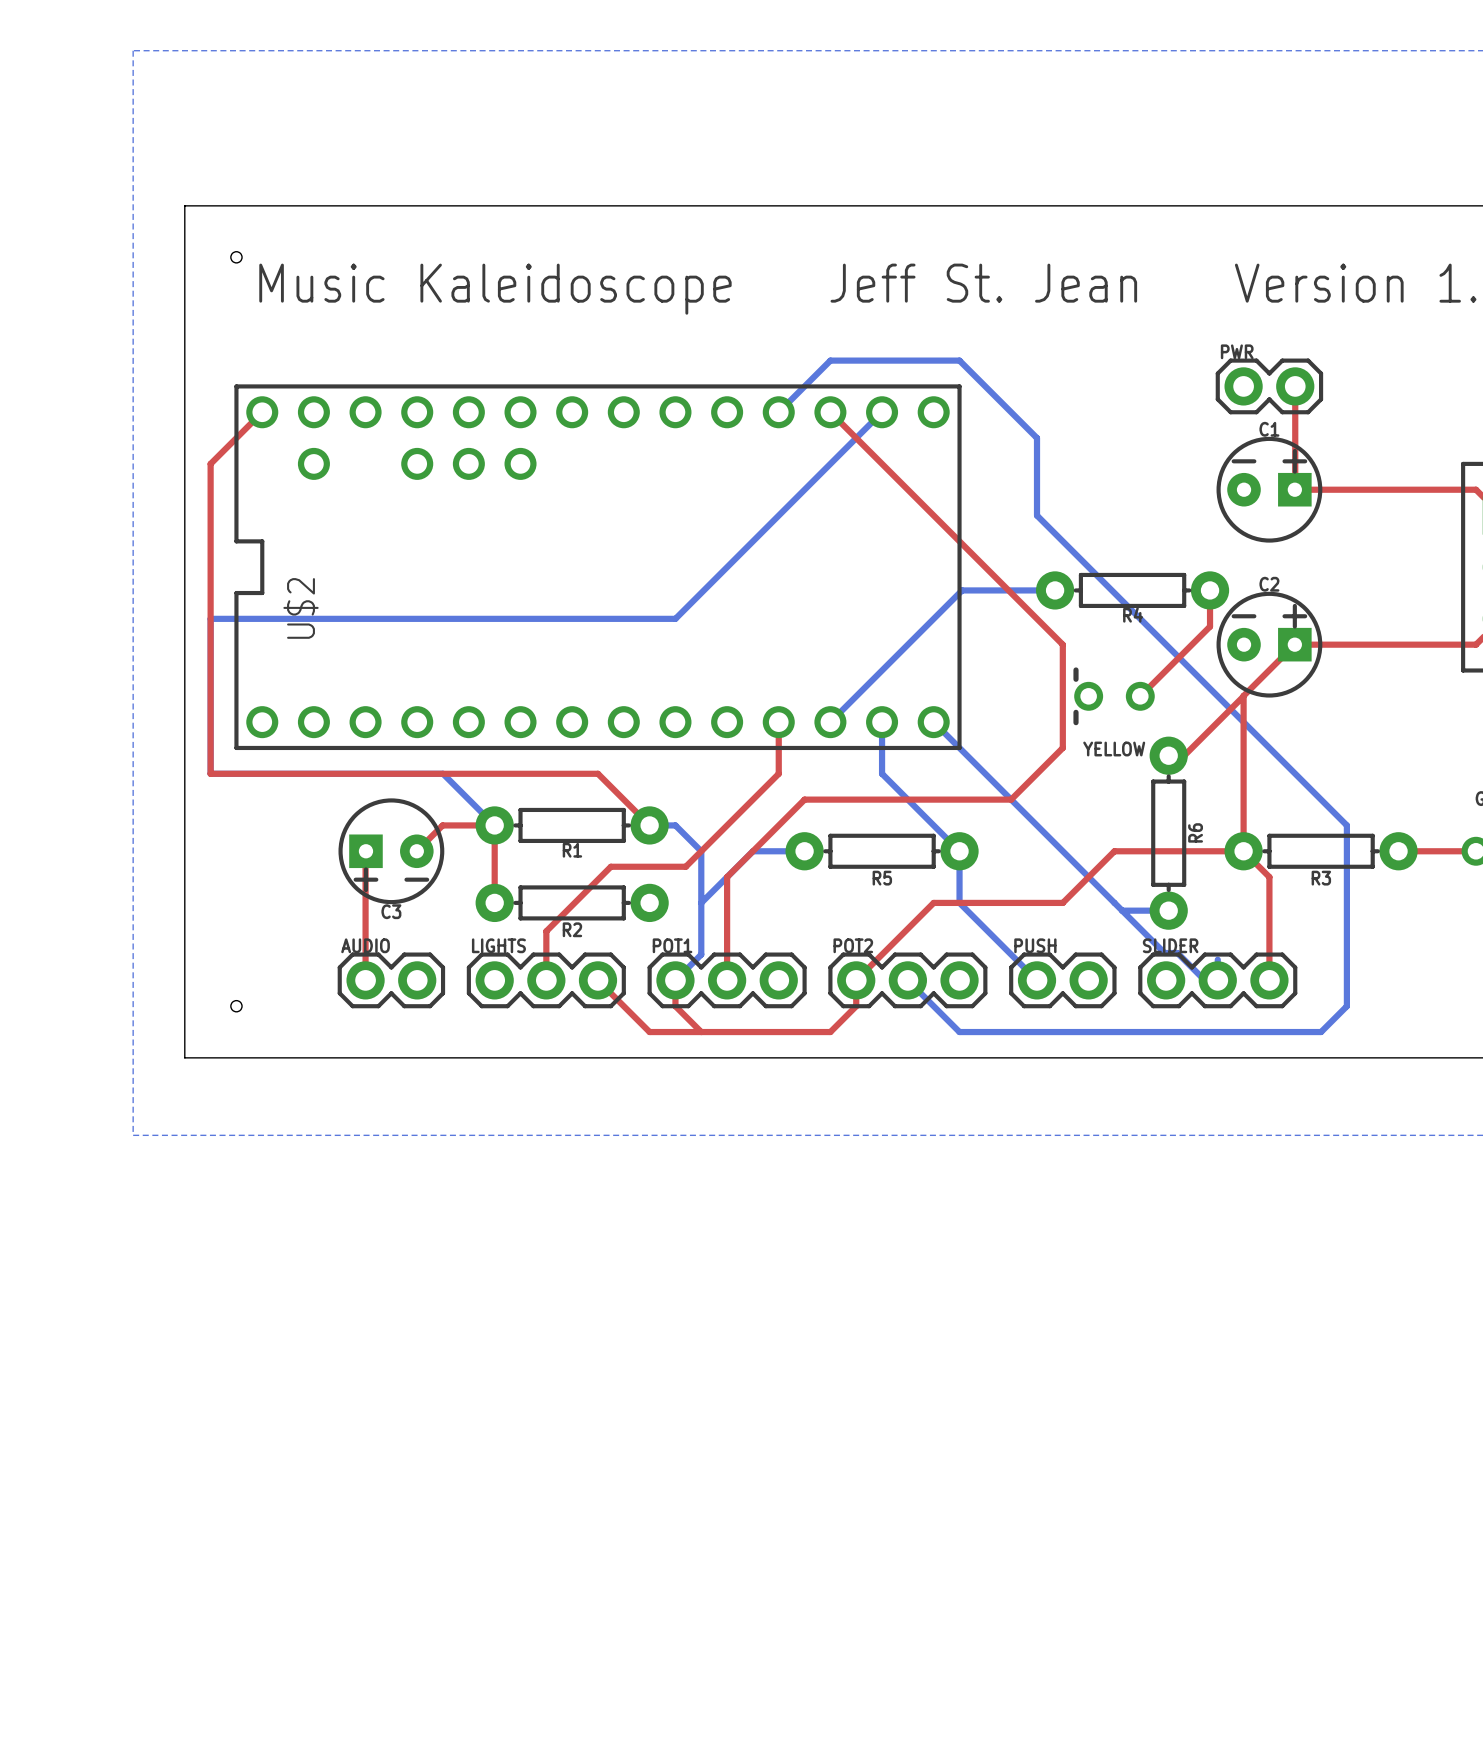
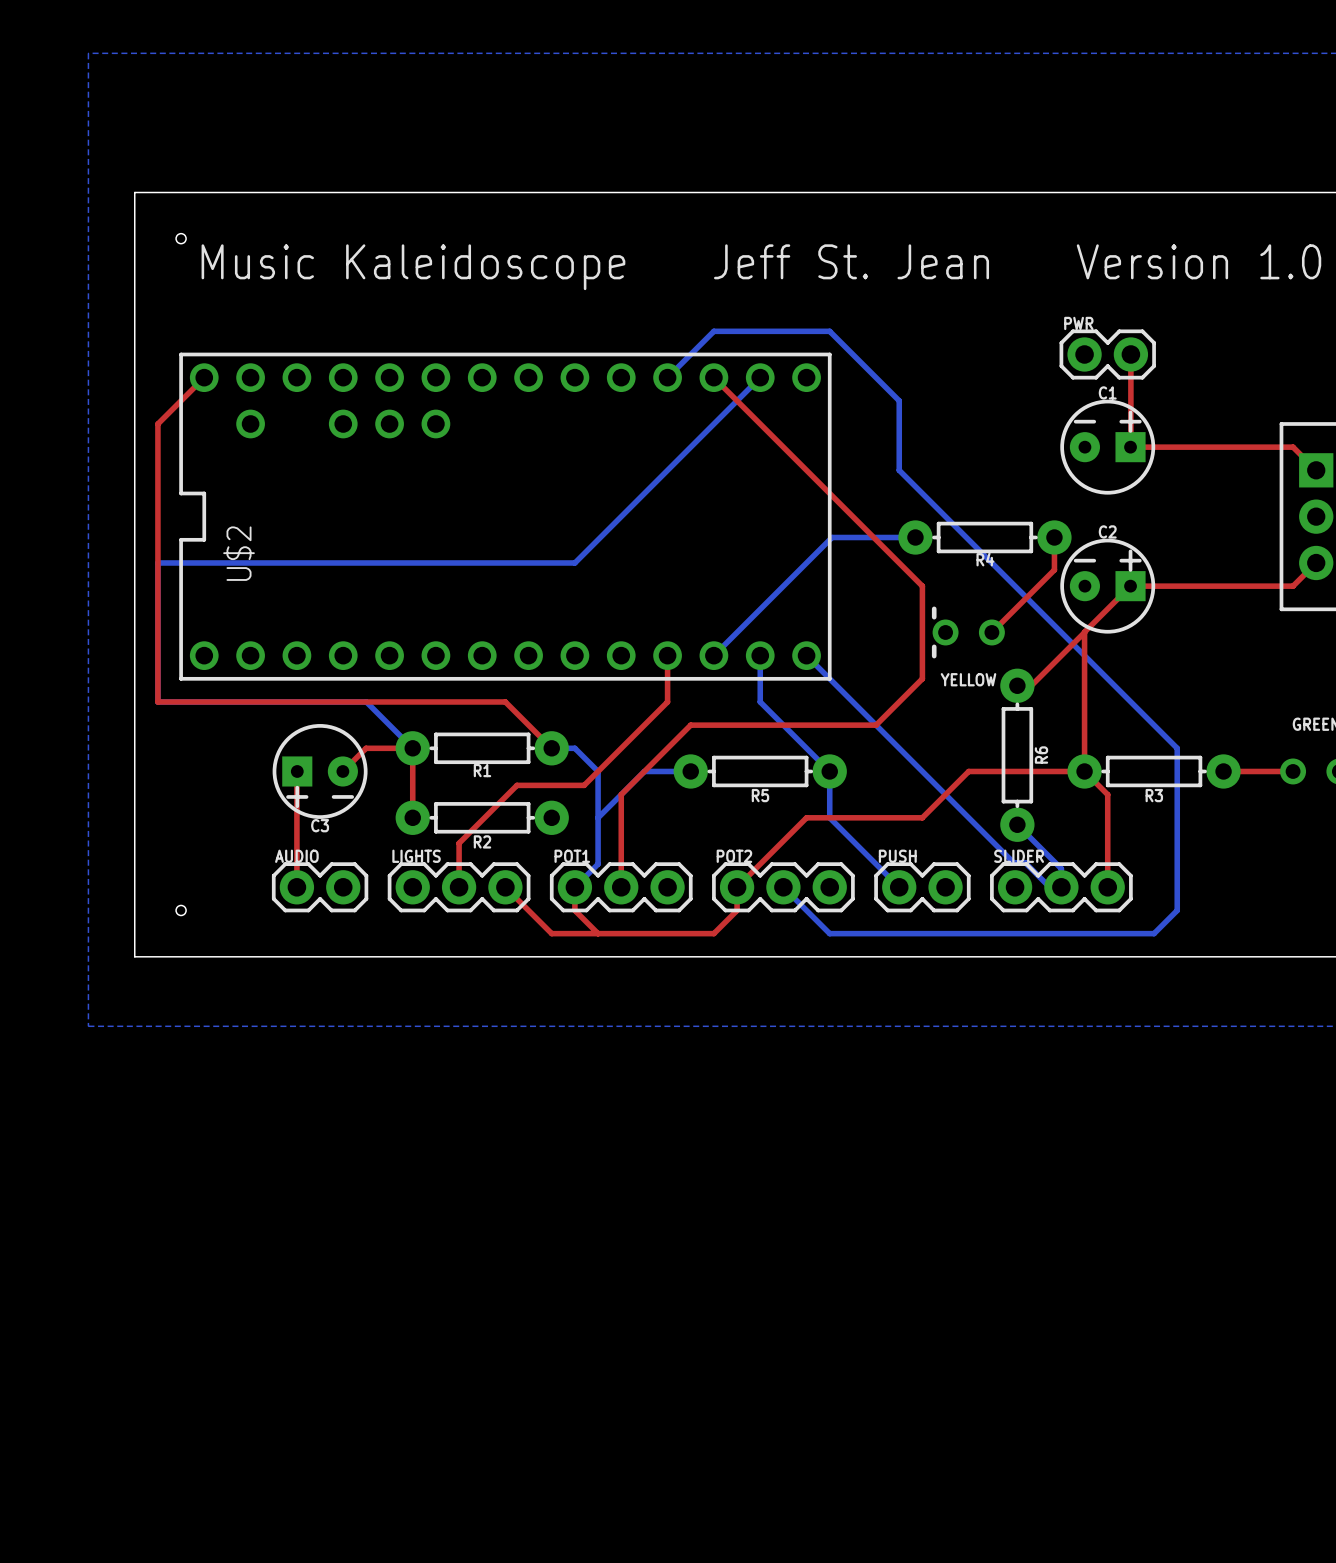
bottom track: (1122, 910) (1168, 910) -> (1061, 868) (1017, 824)

